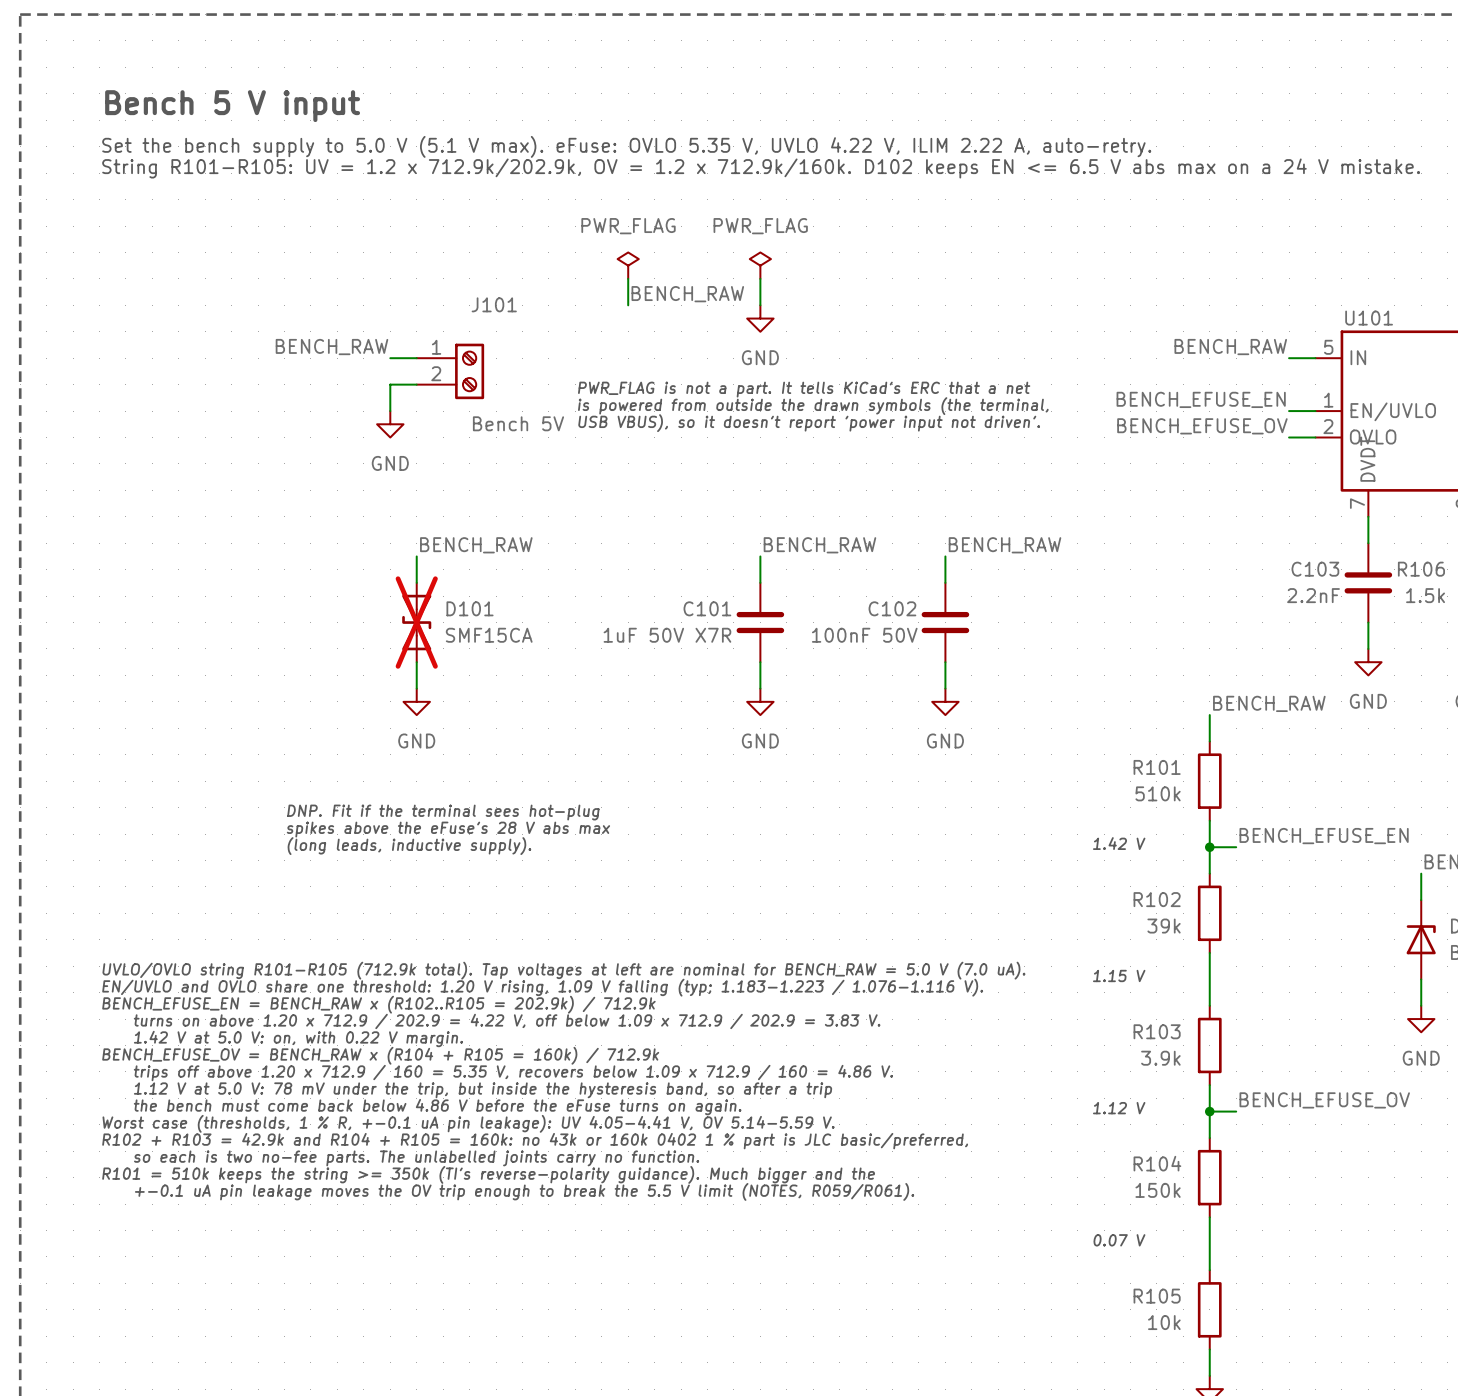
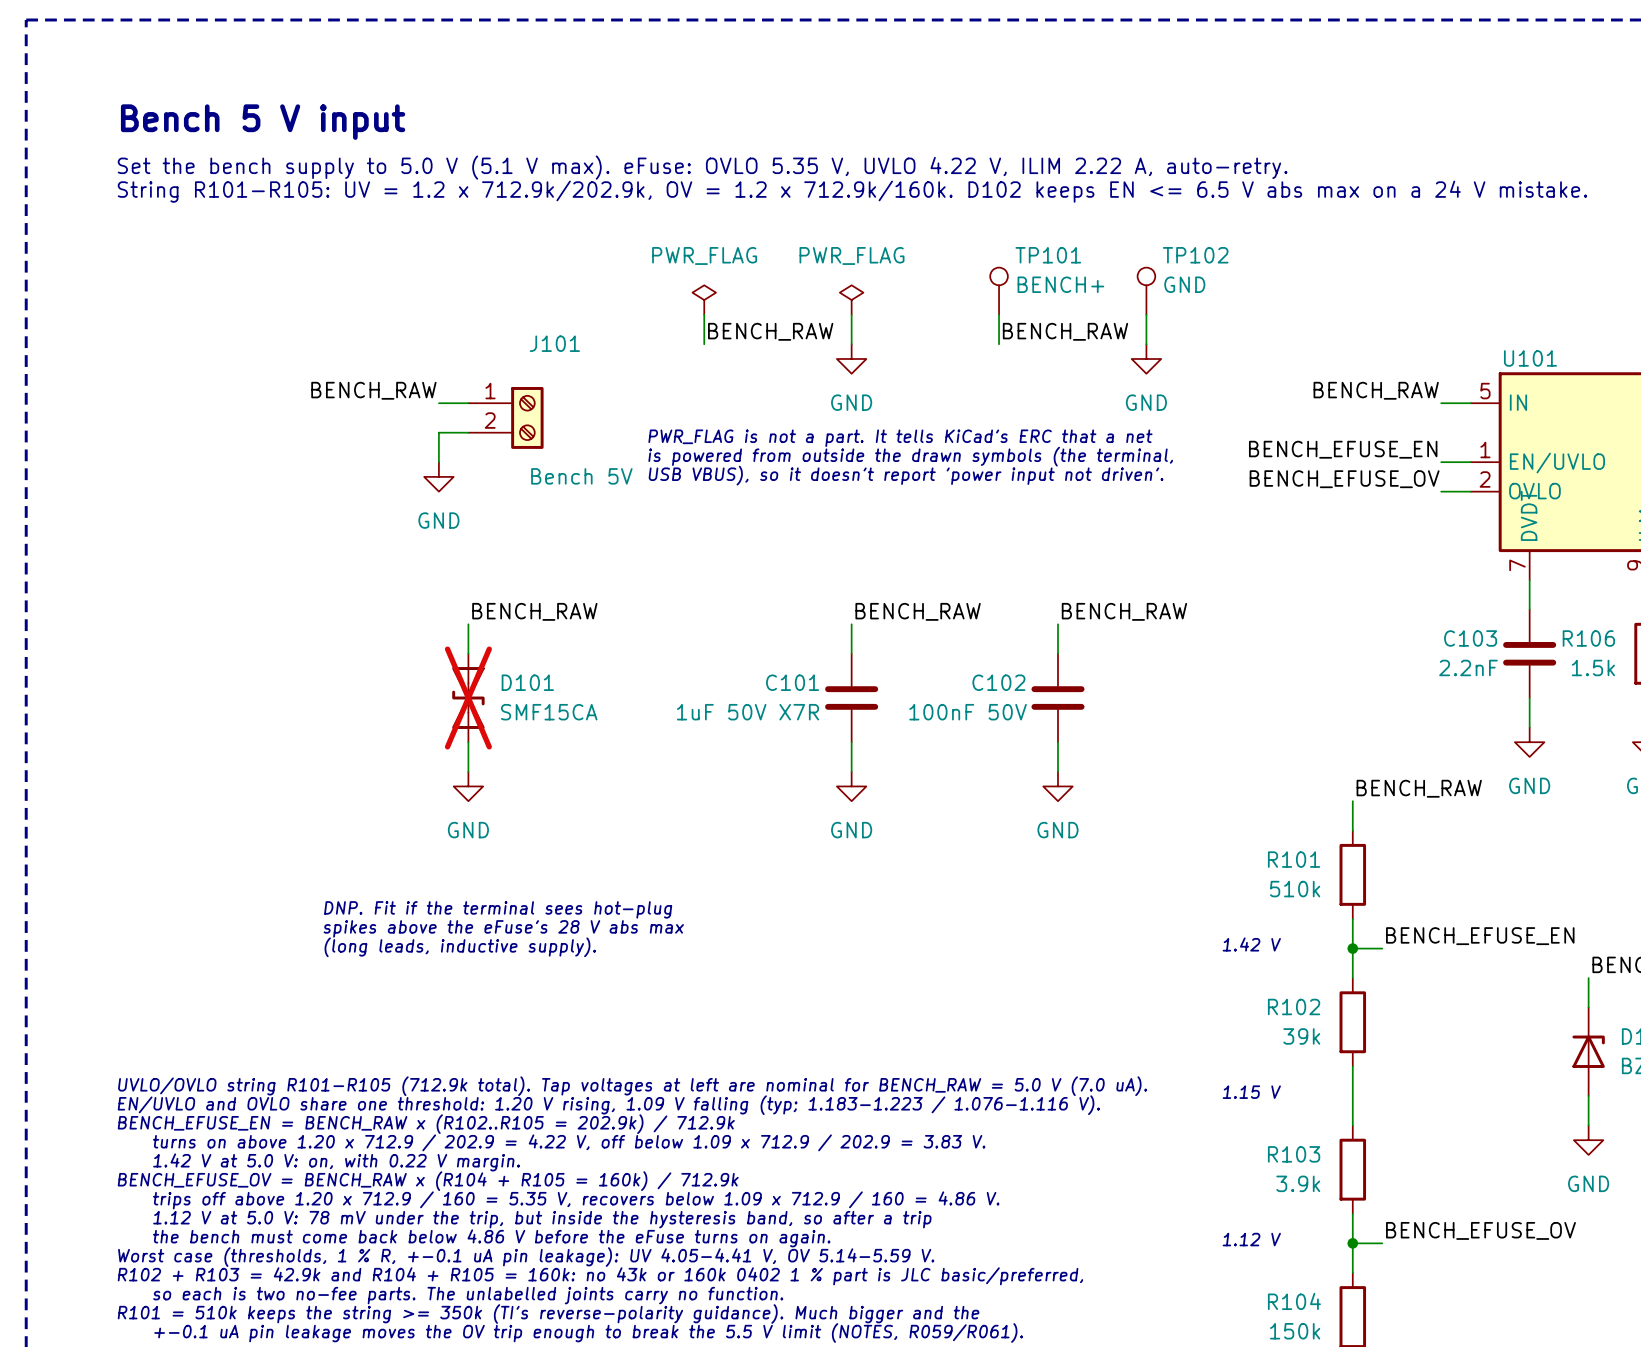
TP101: none -> BENCH+ (999, 291)
TP102: none -> GND (1146, 291)
wire: none -> (999, 314) (999, 344)
wire: none -> (1146, 314) (1146, 344)
label: none -> BENCH_RAW (1065, 331)
power symbol: none -> GND (1146, 358)

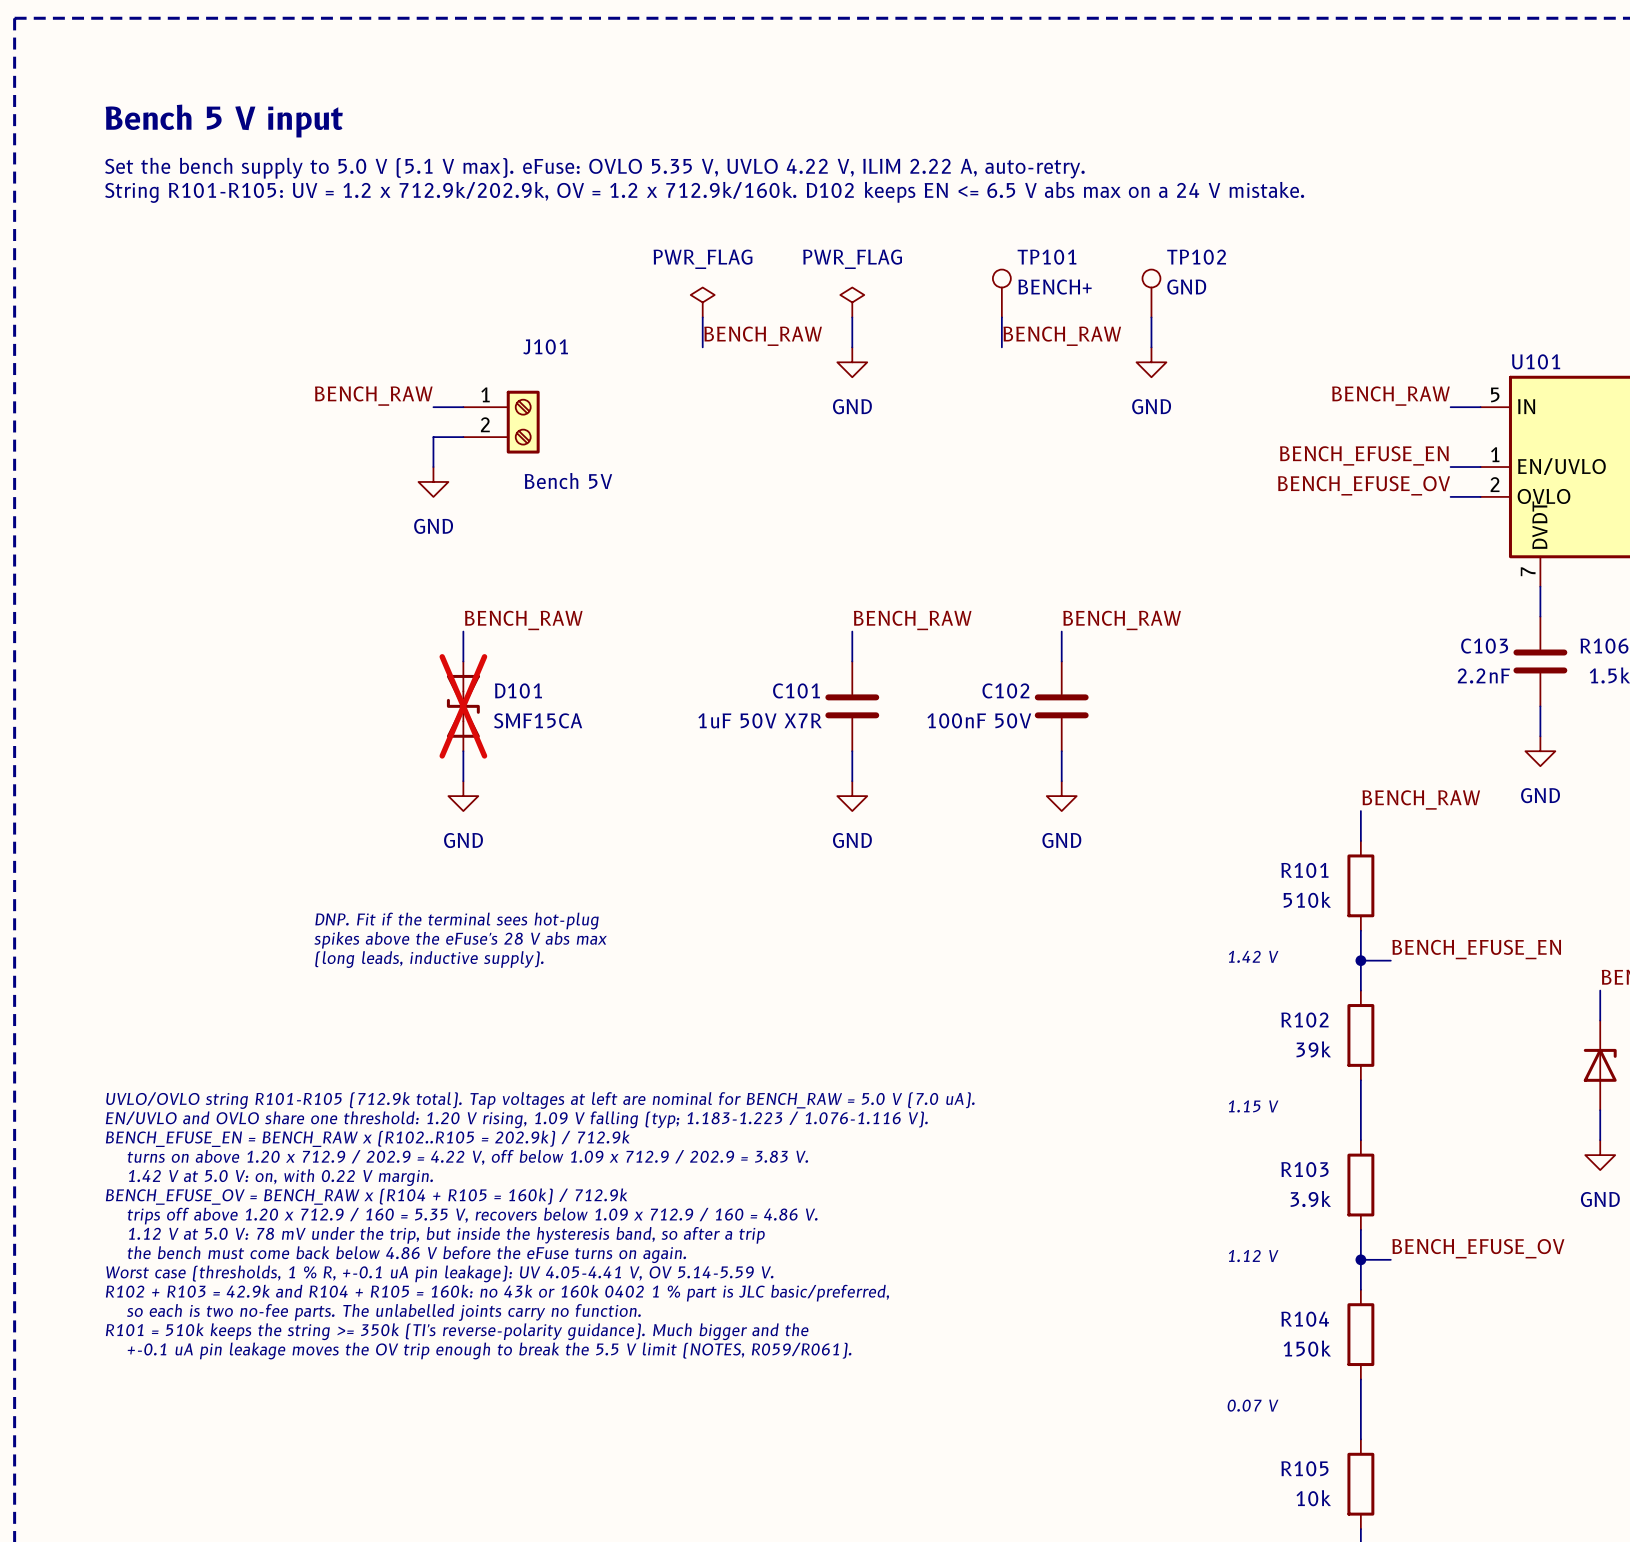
text: PWR_FLAG is not a part. It tells KiCad's ERC that a net (900, 438) -> none
text: is powered from outside the drawn symbols (the terminal, (910, 456) -> none
text: USB VBUS), so it doesn't report 'power input not driven'. (906, 475) -> none

